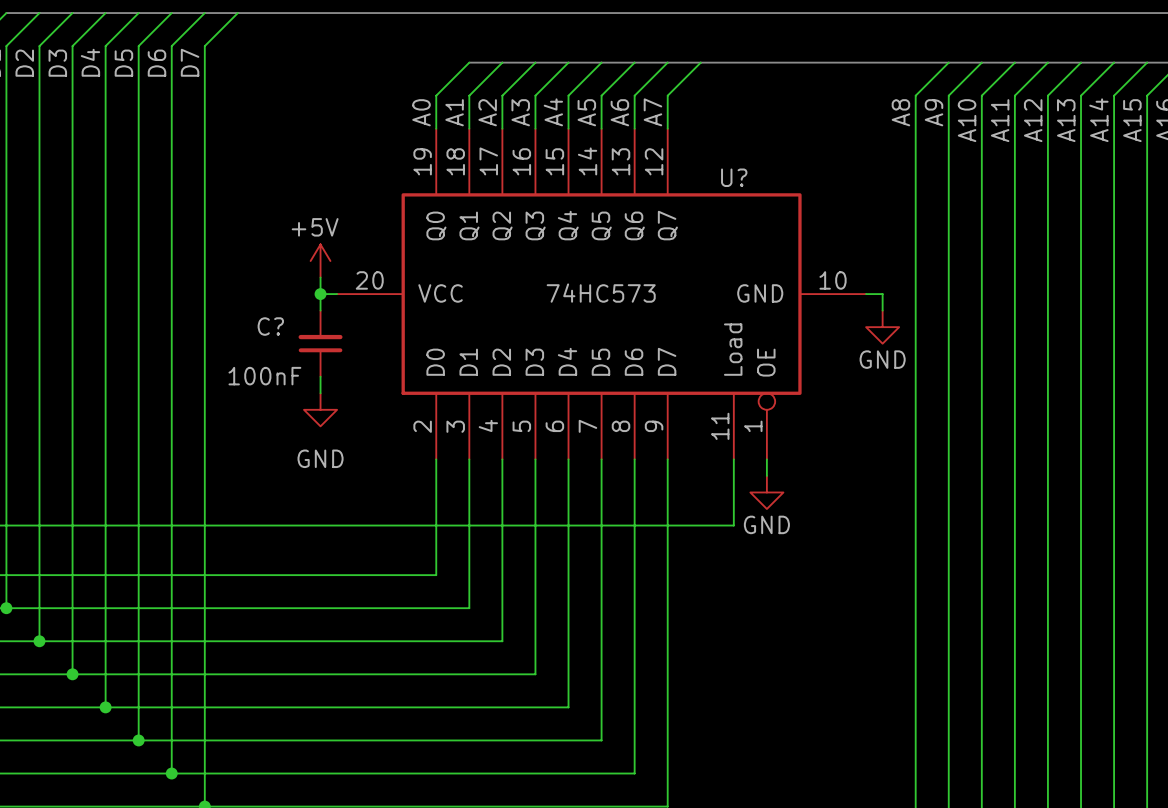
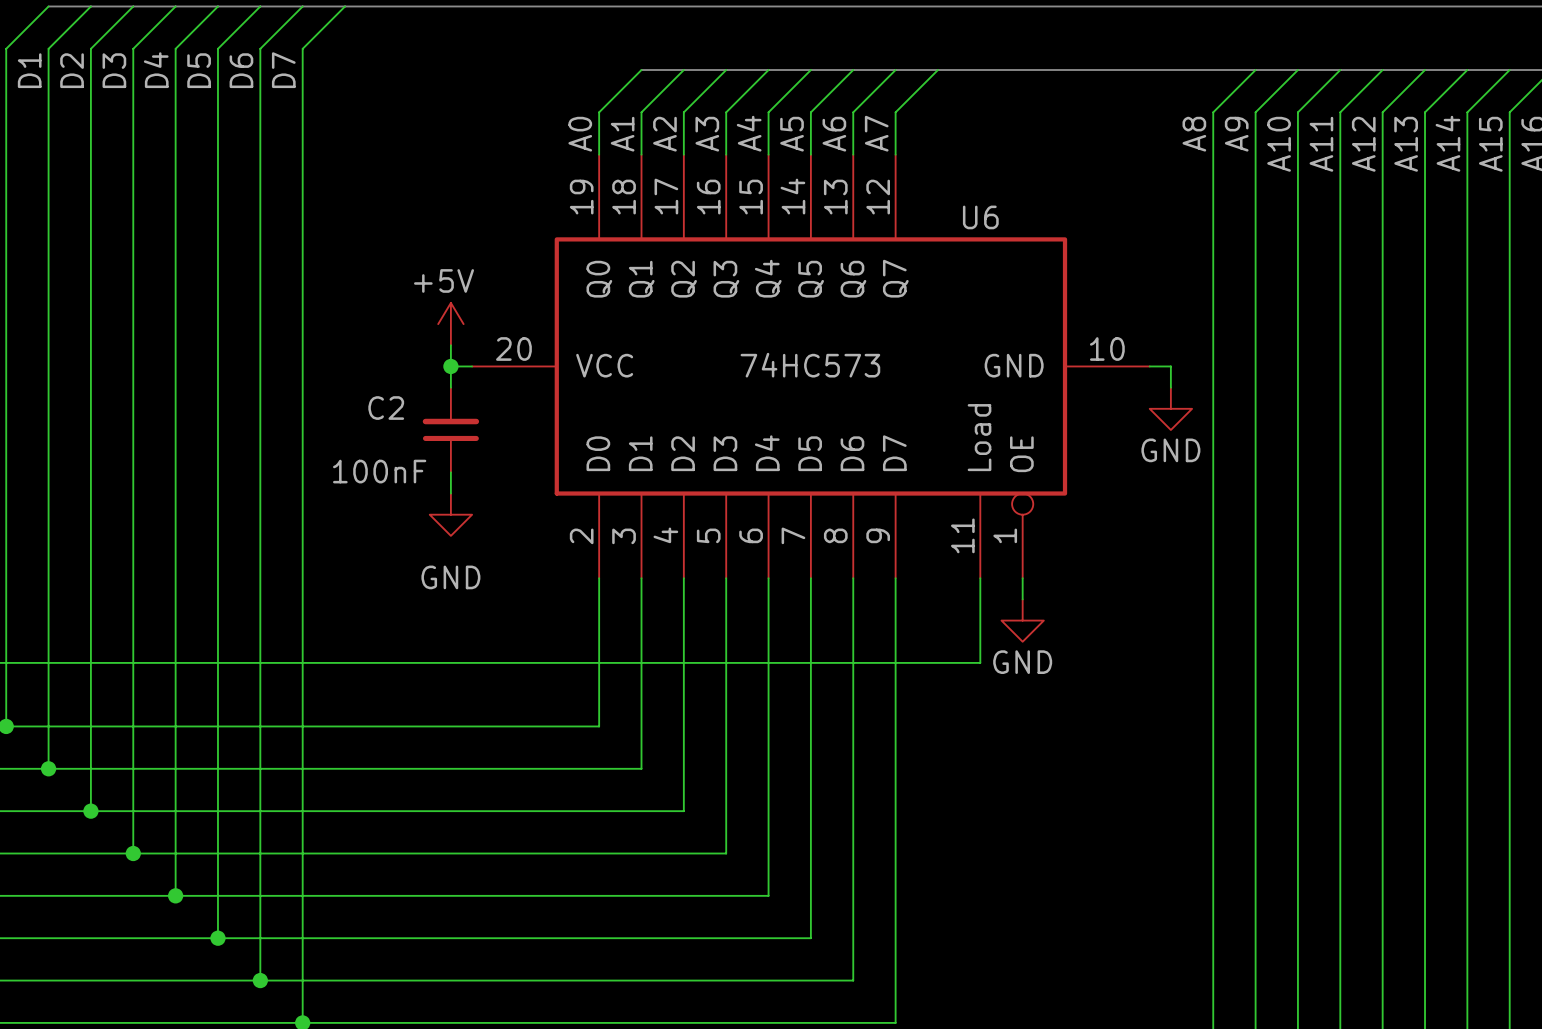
U? name: U? (734, 177) -> U6 (980, 217)
C? name: C? (270, 326) -> C2 (386, 408)

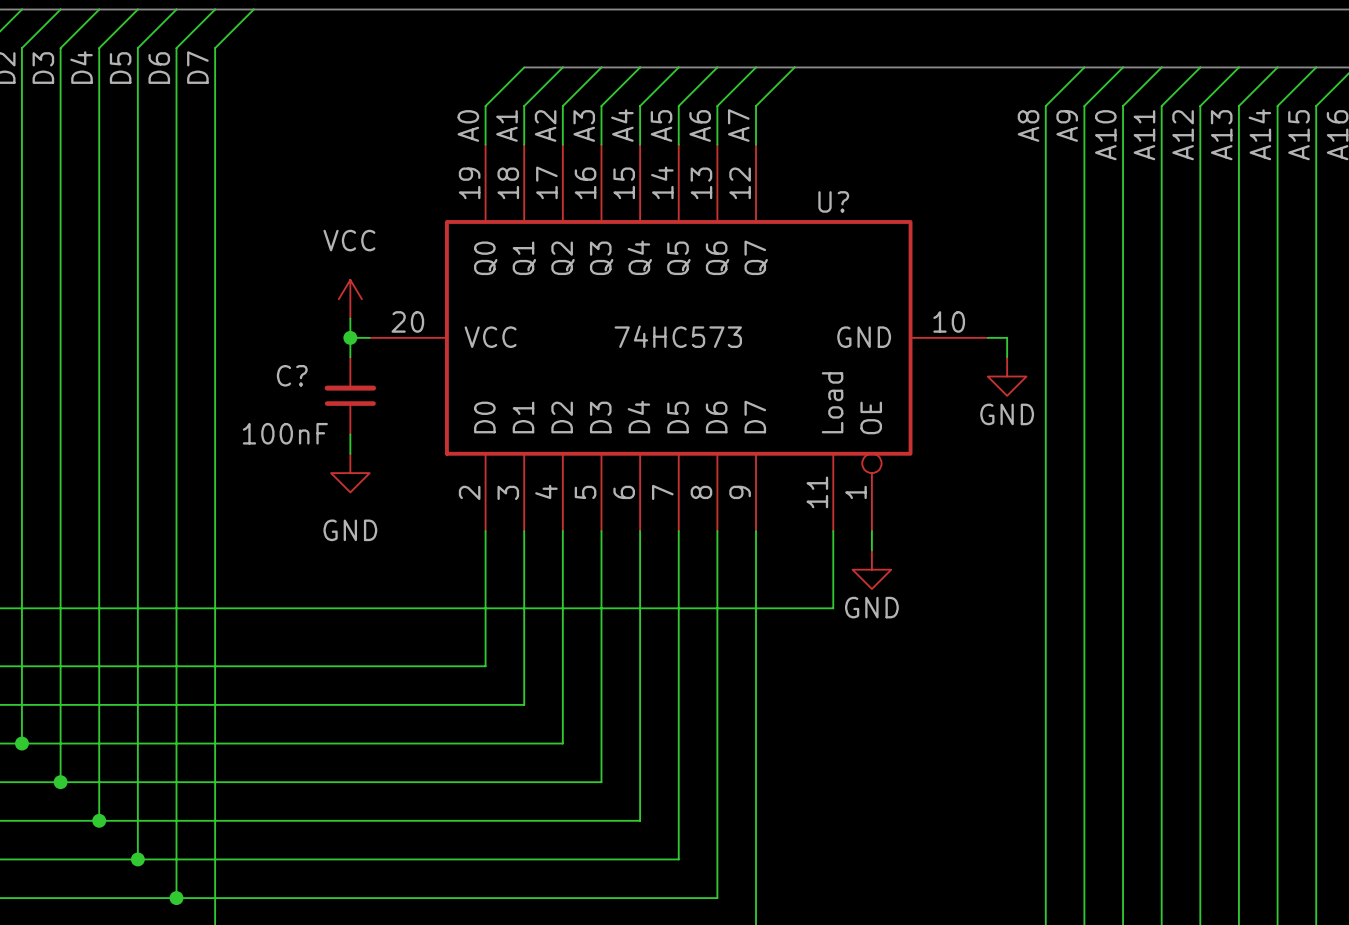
U6 name: U6 (980, 217) -> U? (833, 201)
power symbol: +5V (450, 324) -> VCC (350, 299)
C2 name: C2 (386, 408) -> C? (292, 375)

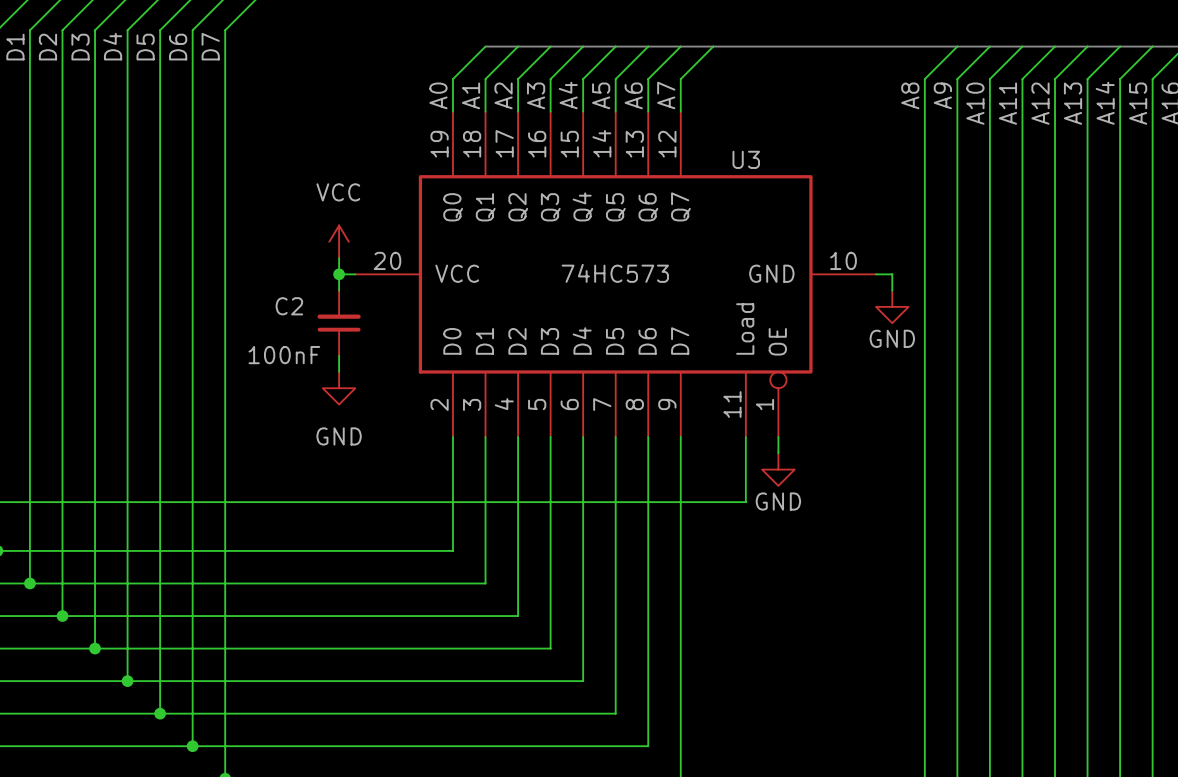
U? name: U? (833, 201) -> U3 (746, 159)
C? name: C? (292, 375) -> C2 (289, 306)

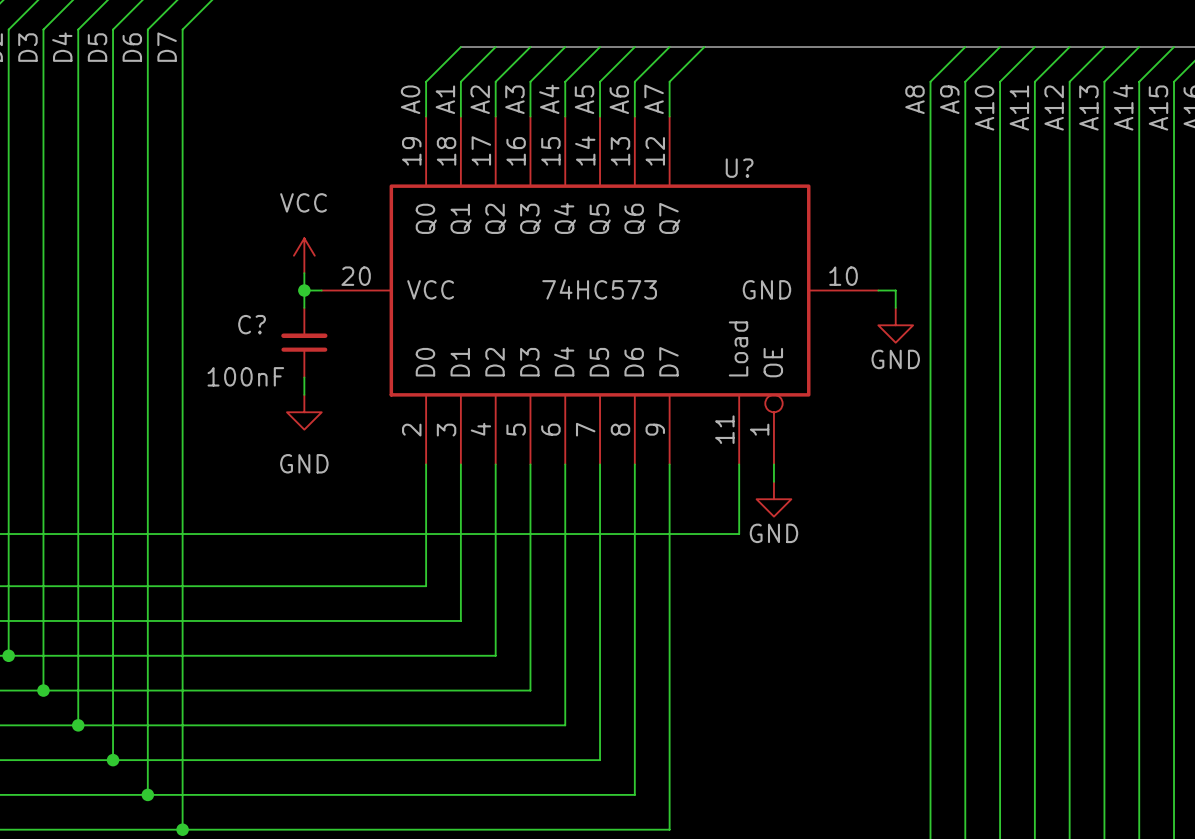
U3 name: U3 (746, 159) -> U? (739, 168)
C2 name: C2 (289, 306) -> C? (252, 324)

